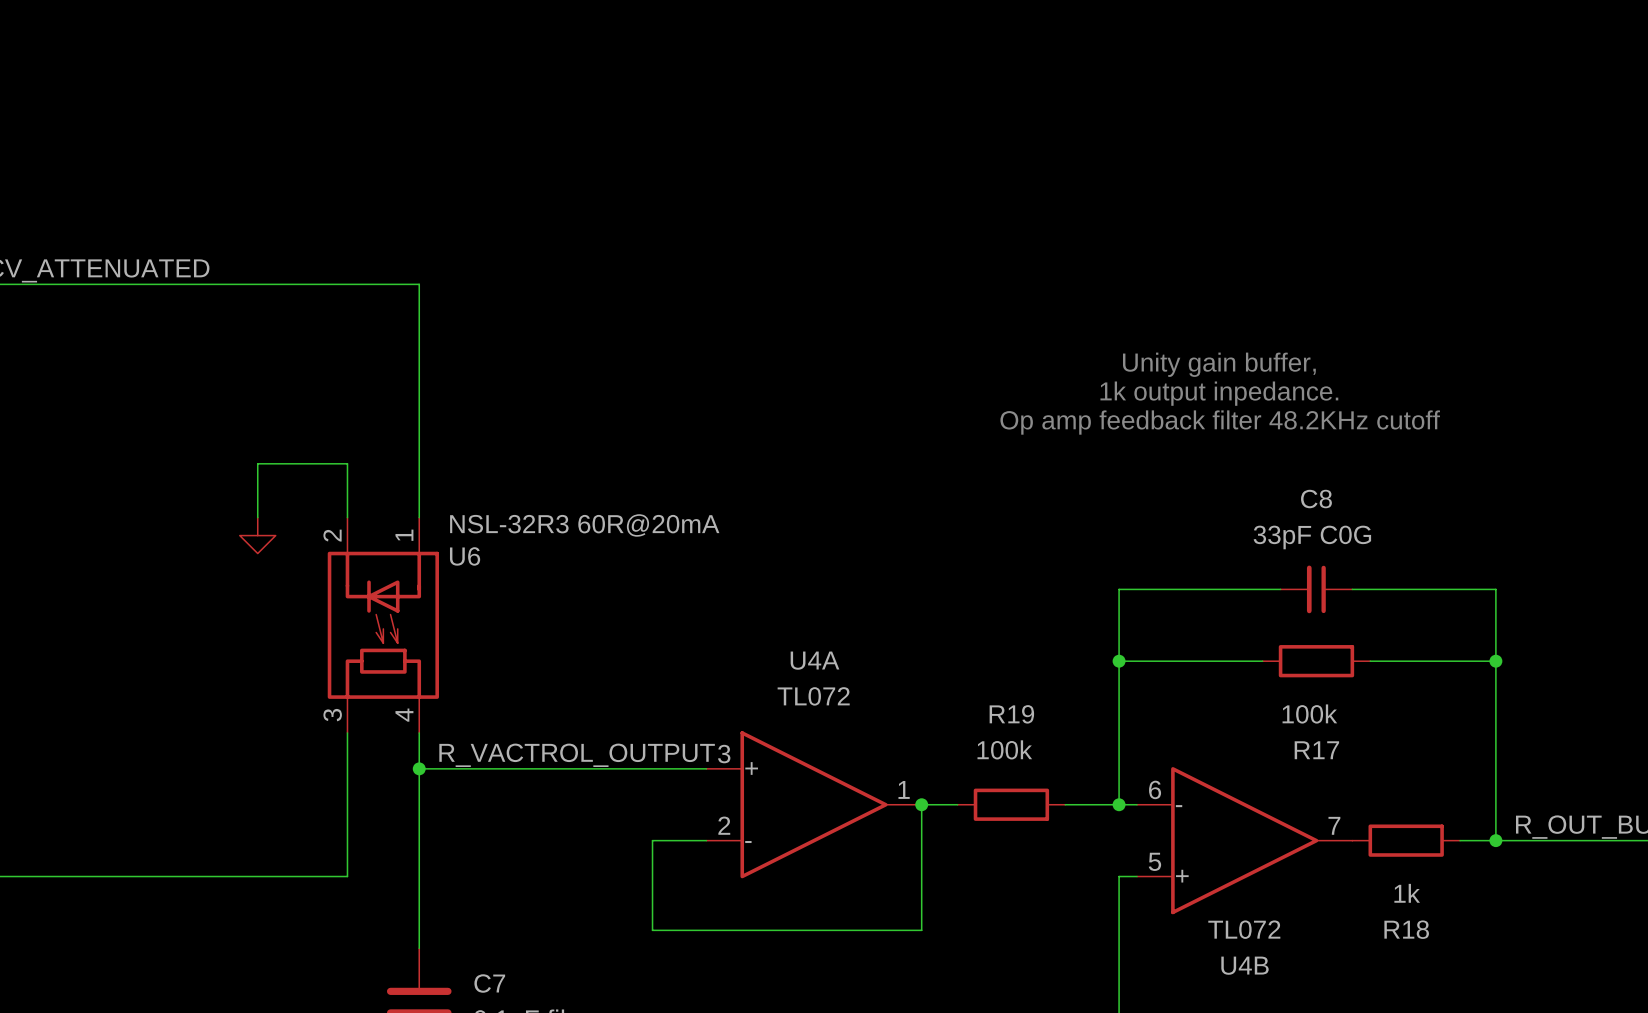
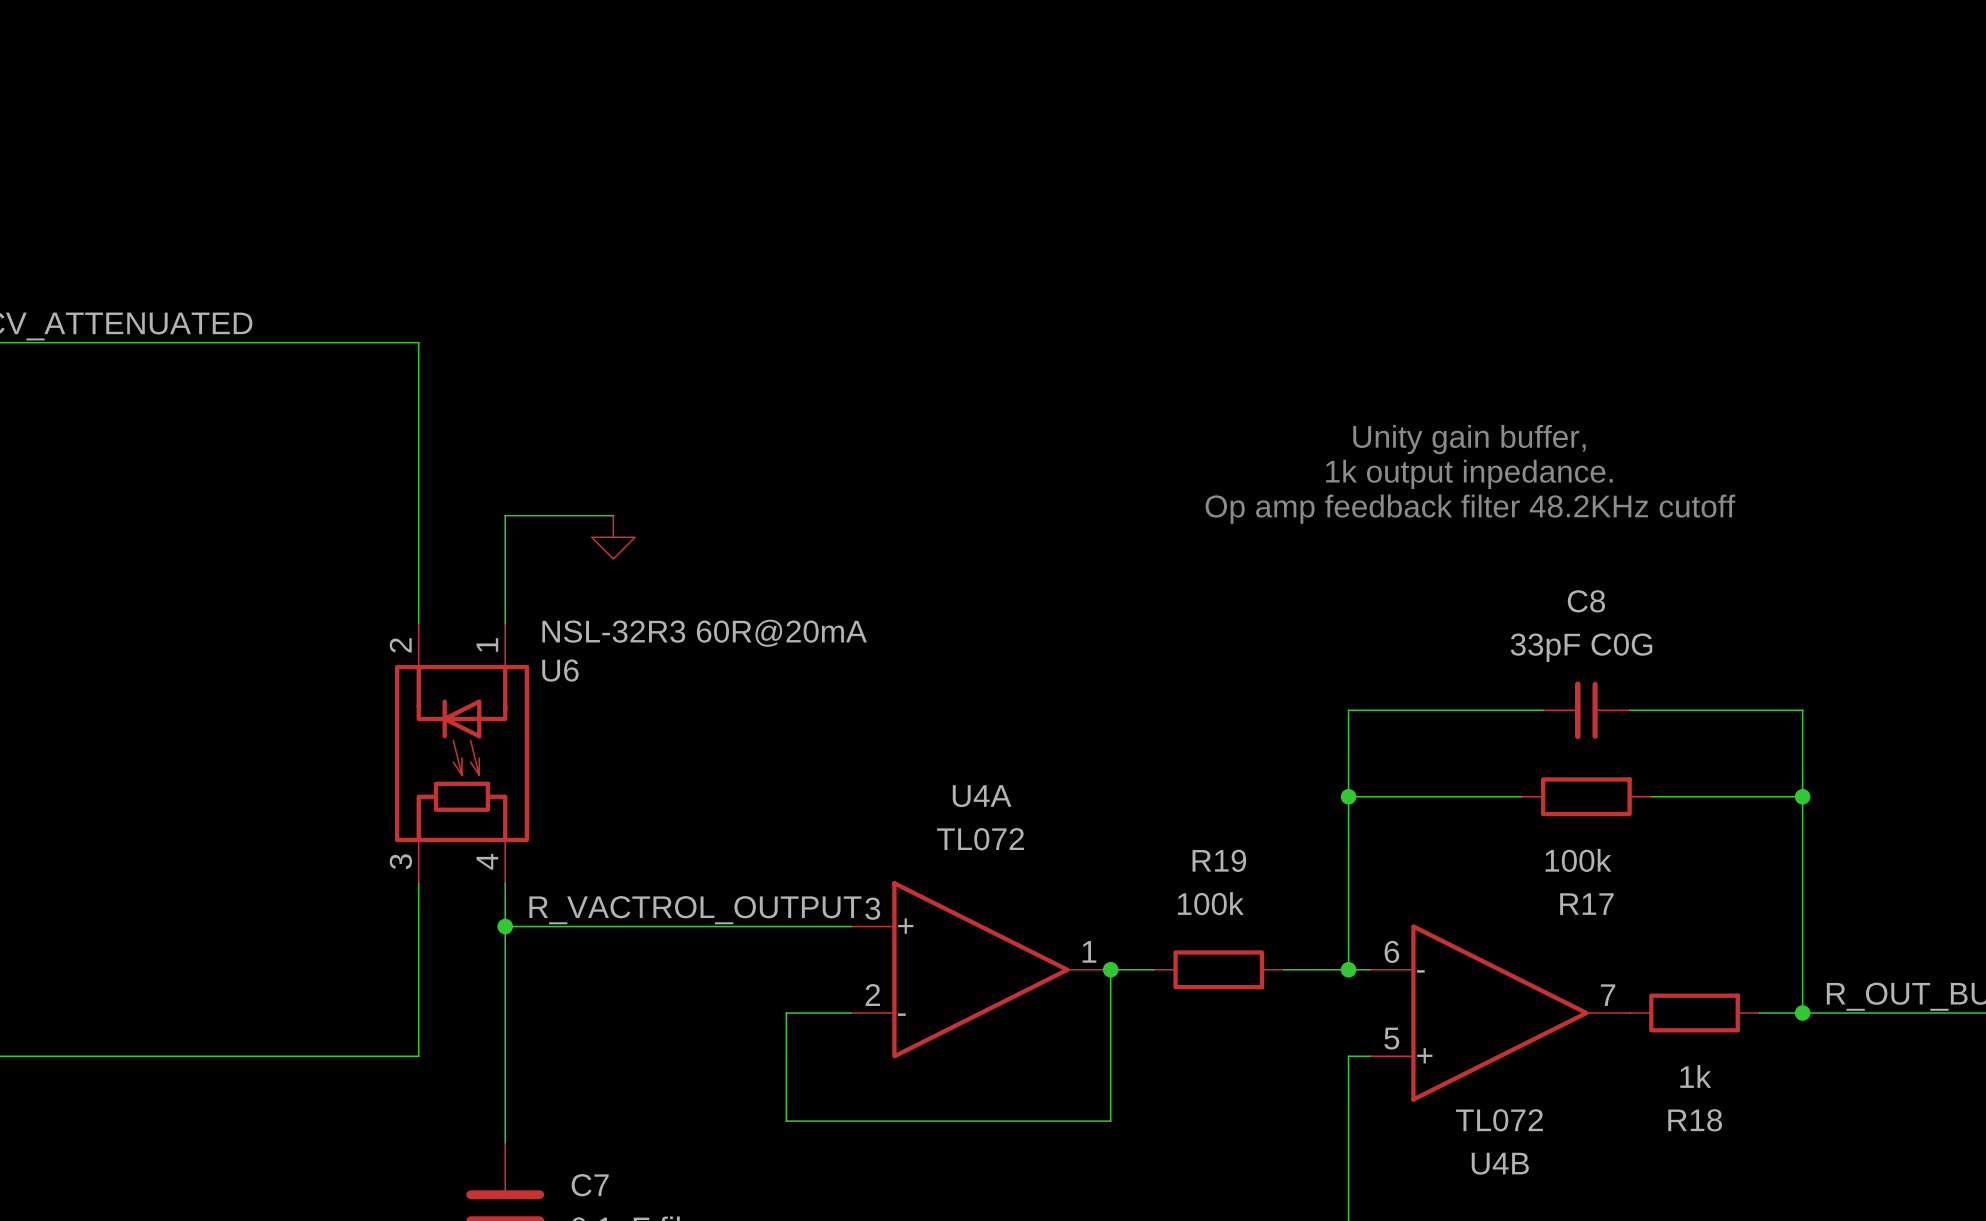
wire: (347, 284) (419, 284) (419, 427) -> (418, 342) (418, 558)
wire: none -> (505, 515) (613, 515)
wire: (347, 463) (257, 463) (257, 517) -> none
power symbol position: (257, 535) -> (613, 537)

